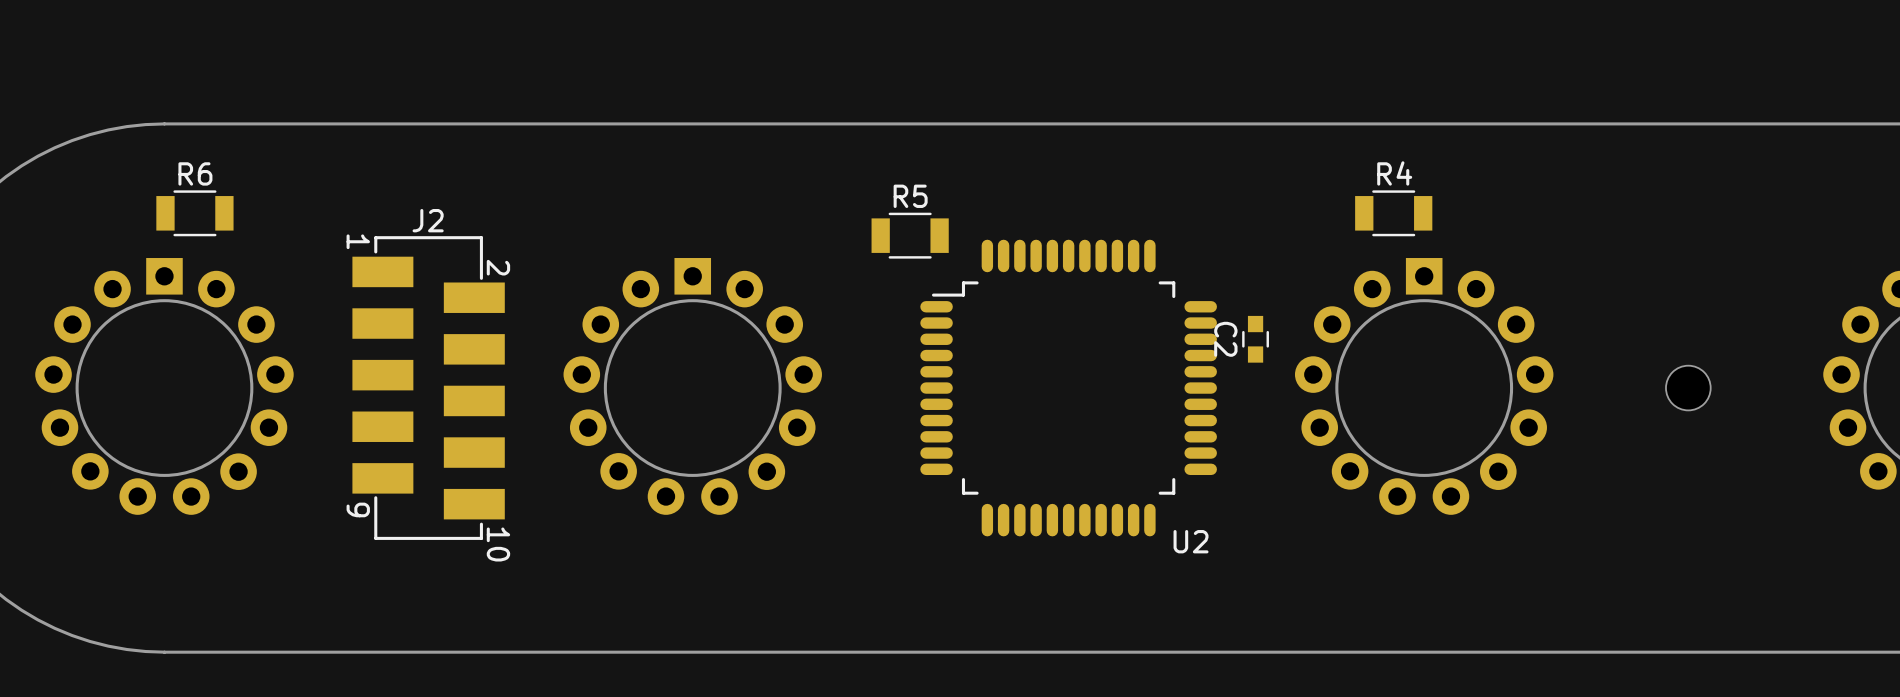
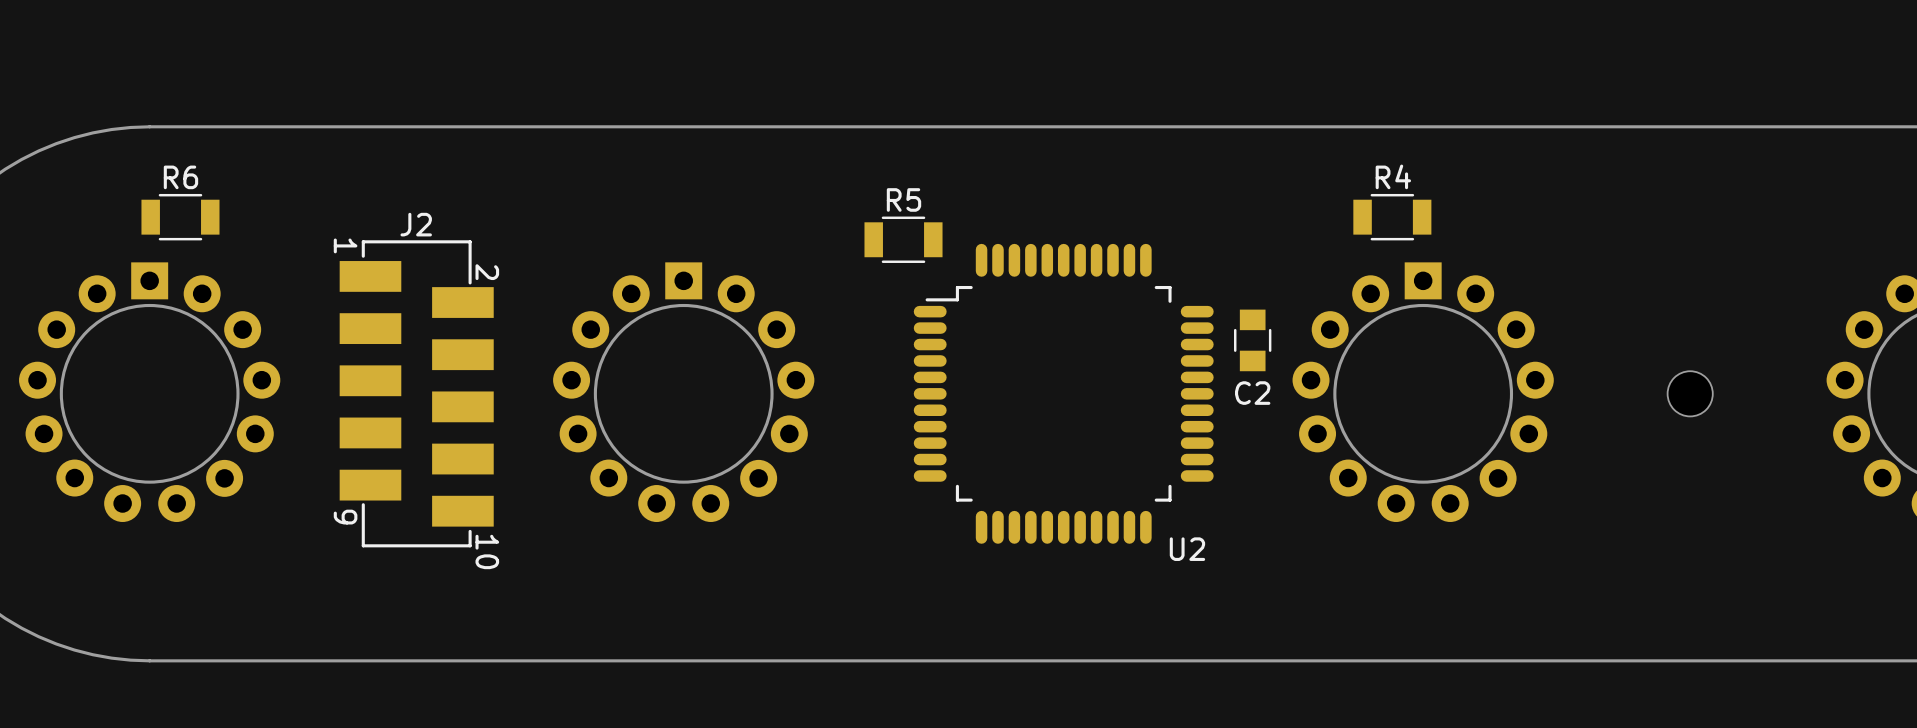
C2 footprint: [1242, 315, 1269, 363] -> [1233, 309, 1272, 372]
C2 name rotation: 0° (1225, 339) -> 90° counterclockwise (1252, 393)
C2 name position: C2 (1225, 339) -> C2 (1252, 393)

